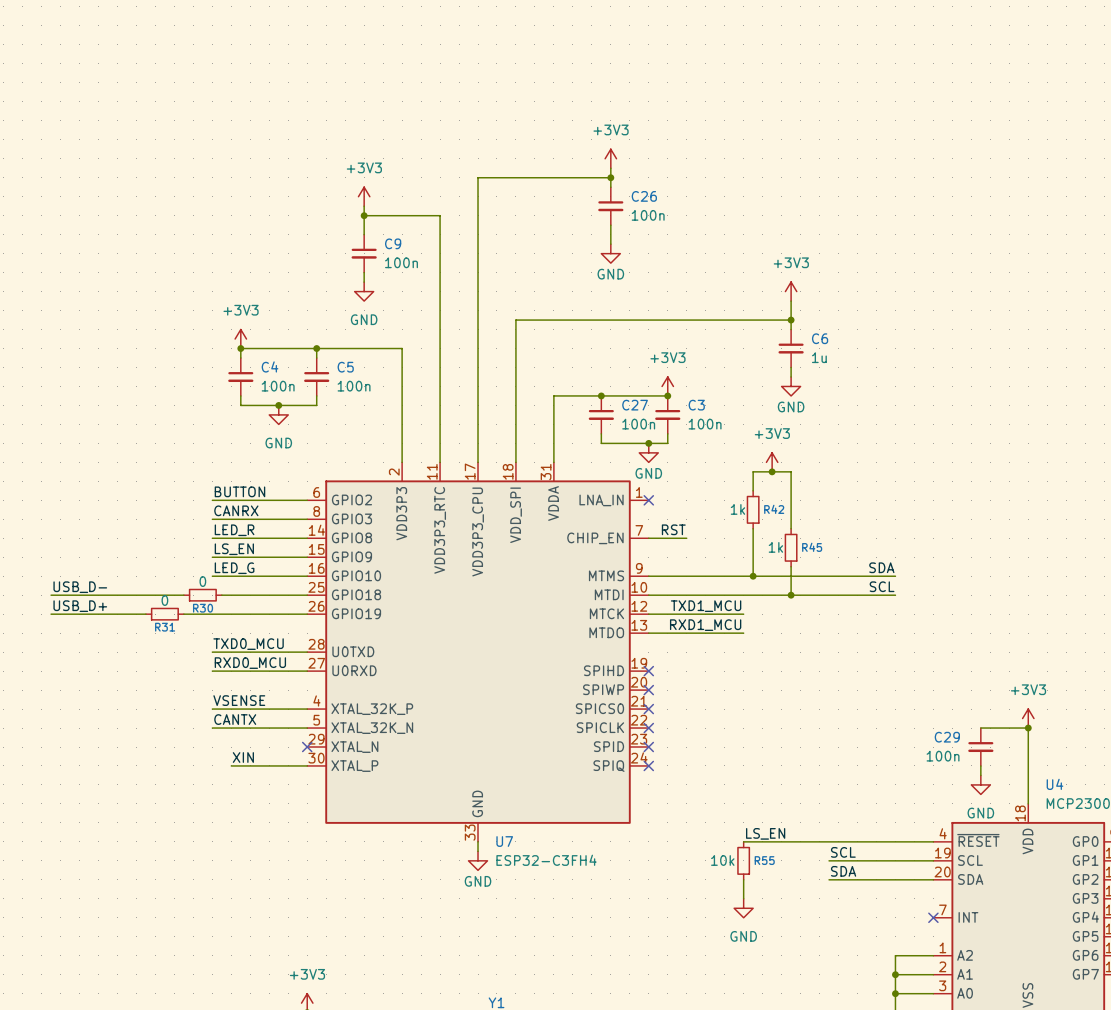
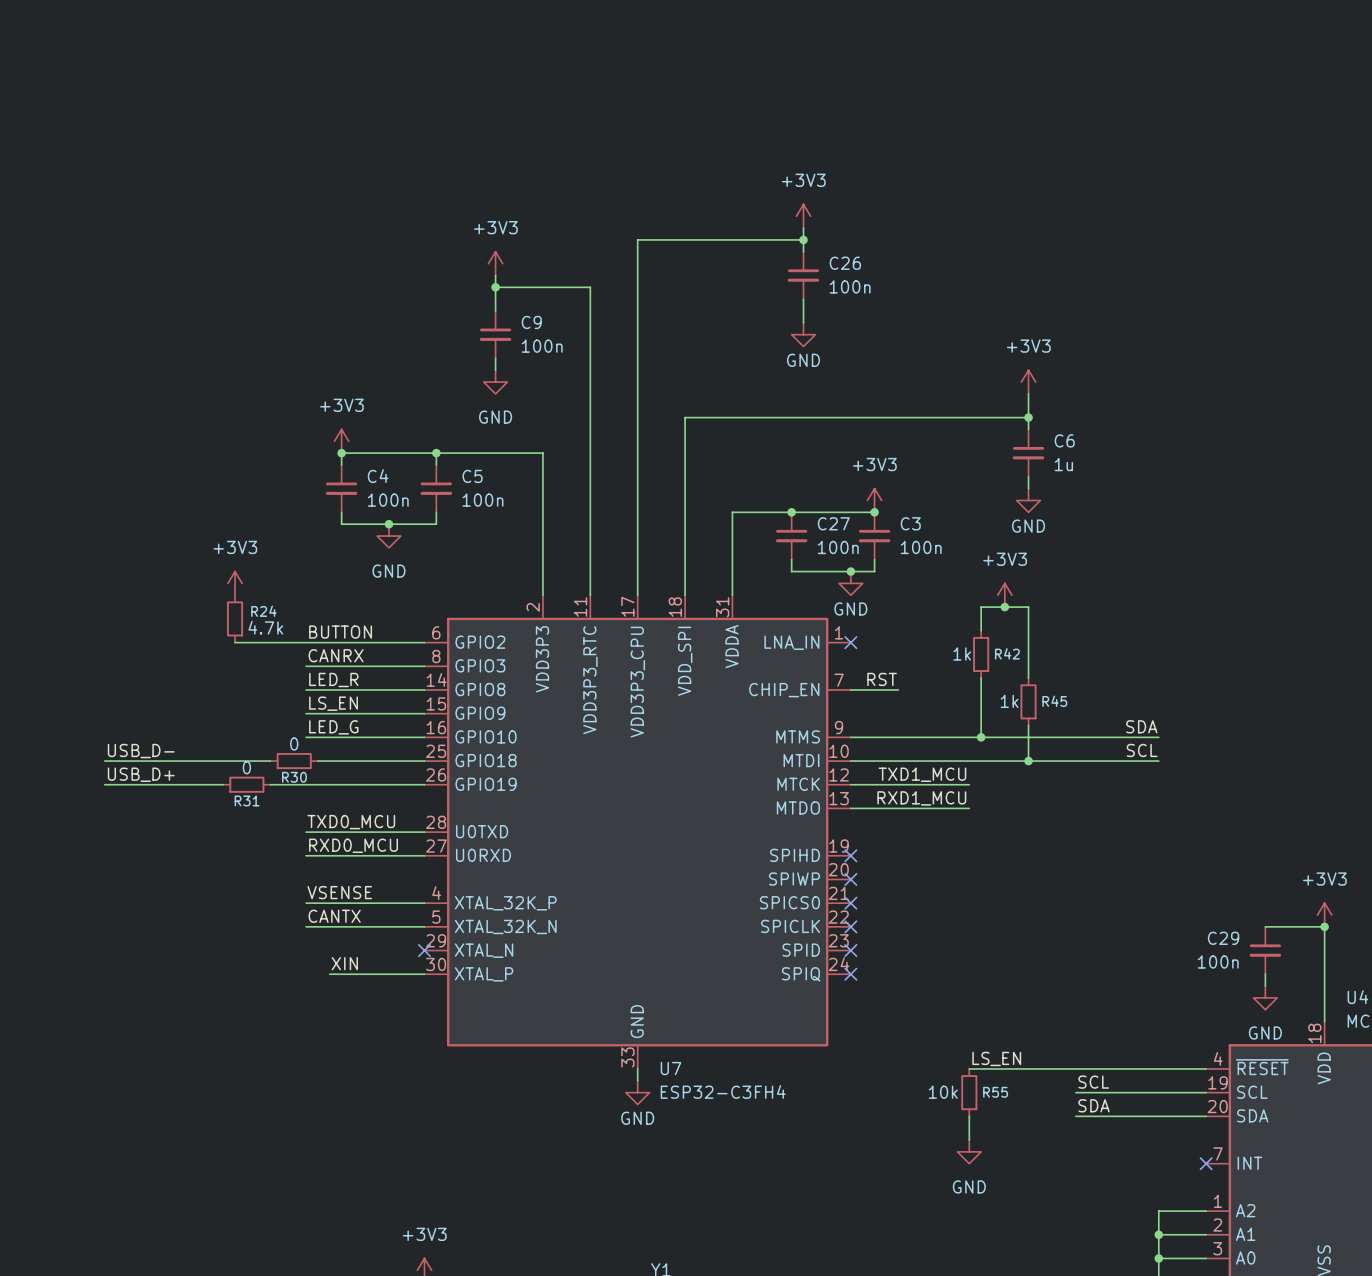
power symbol: none -> +3V3 (235, 583)
R24: none -> 4.7k (235, 618)
wire: none -> (235, 642) (306, 642)

